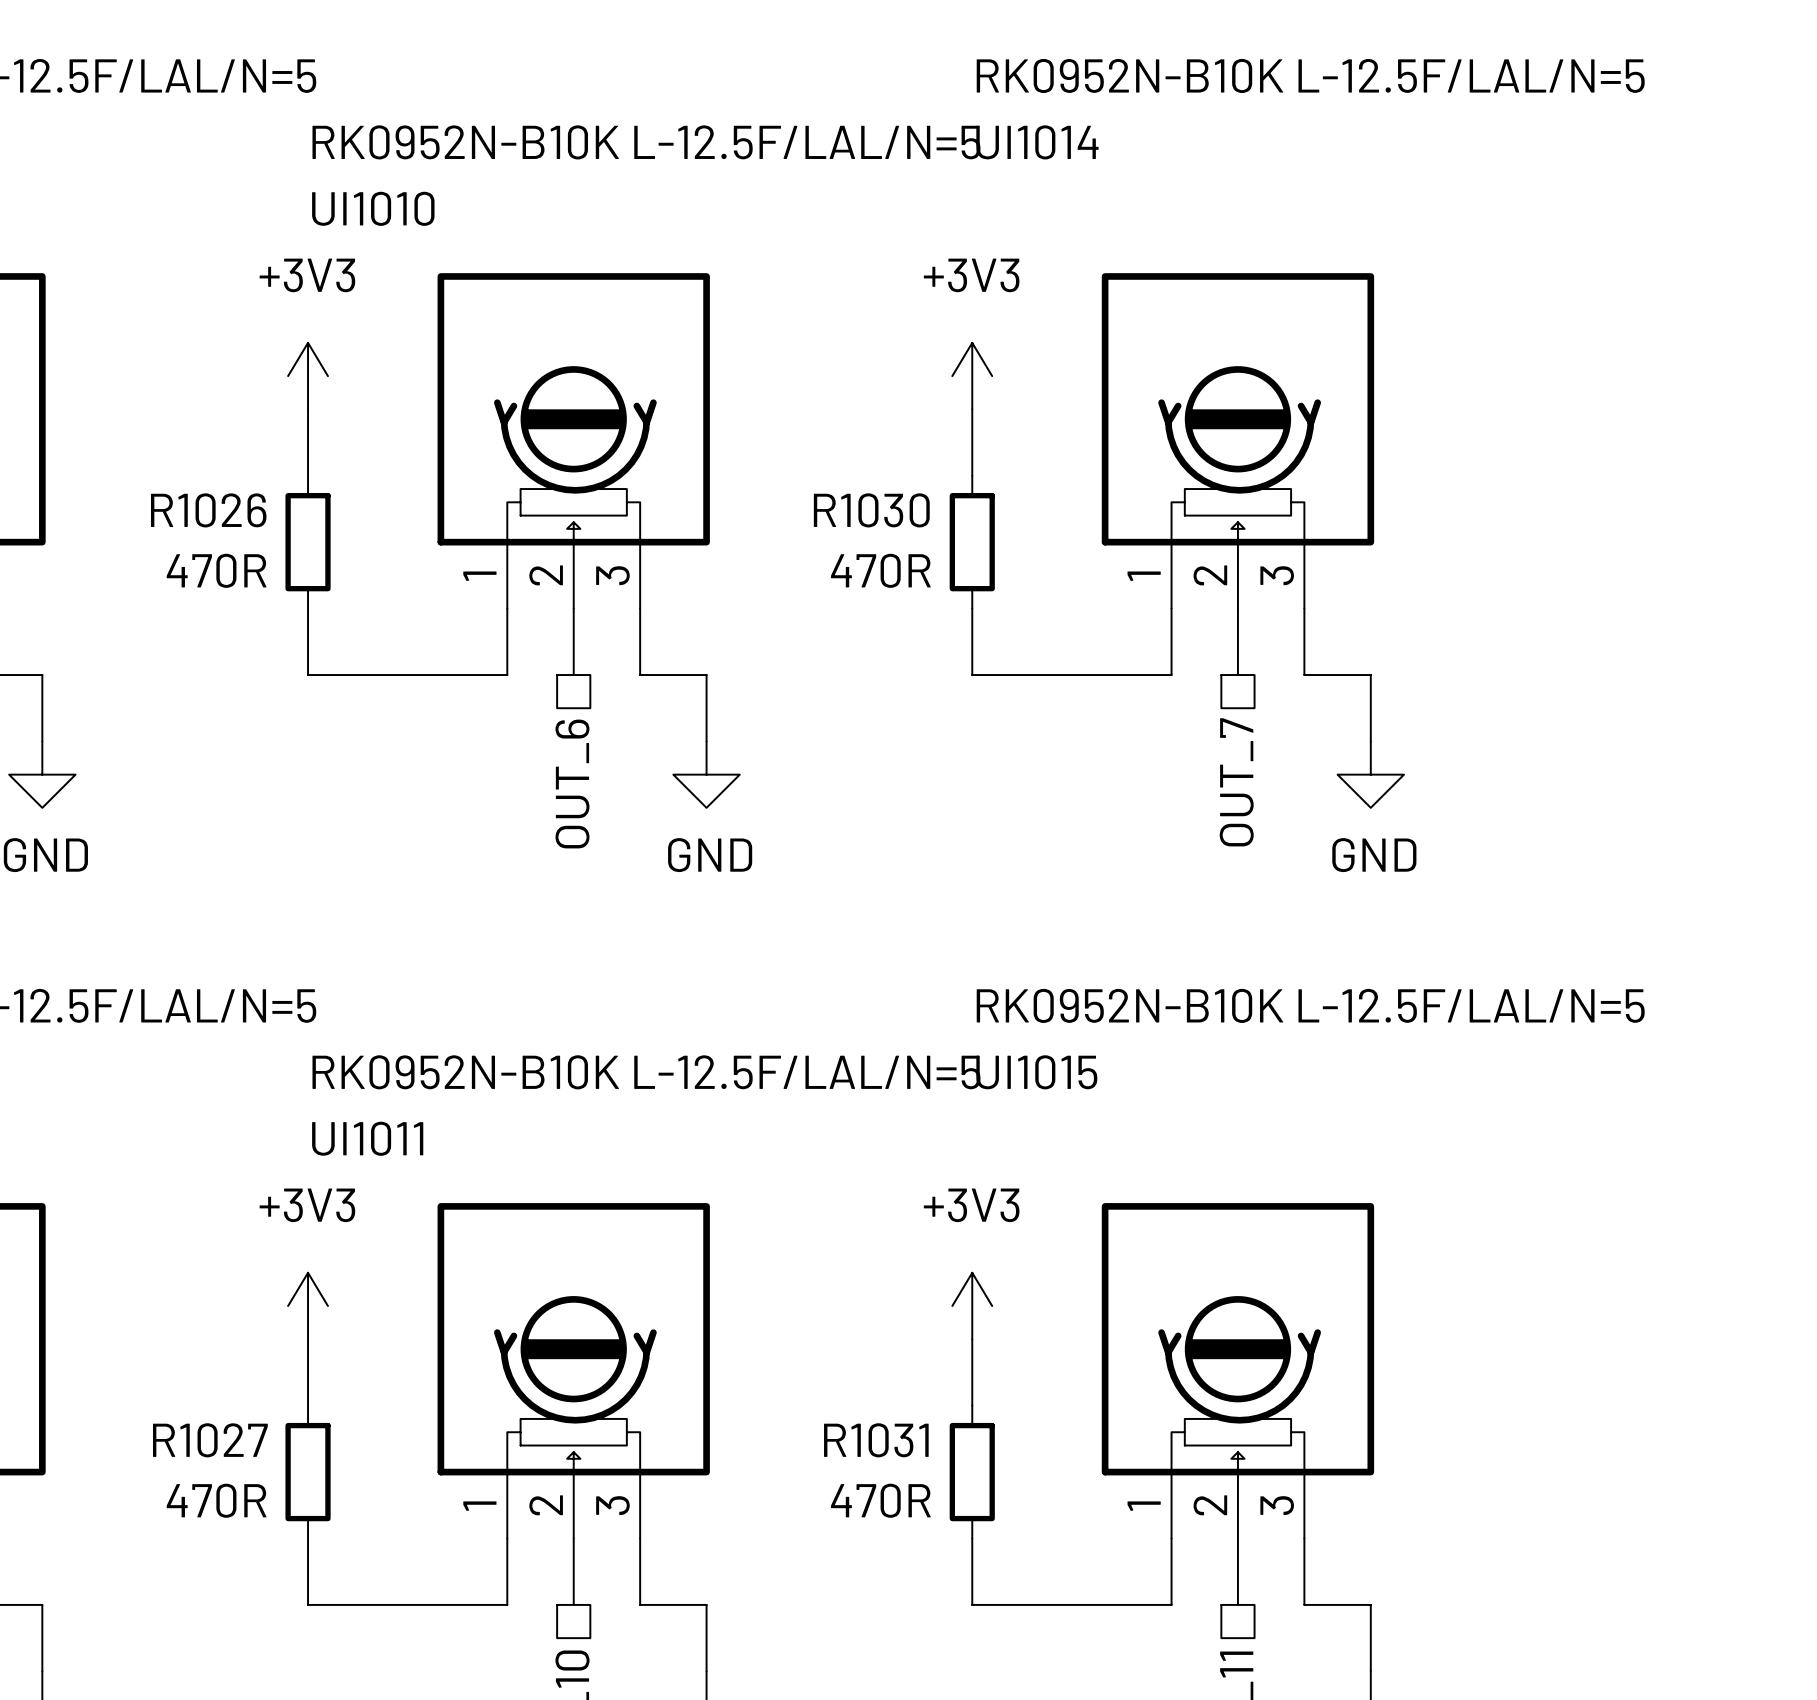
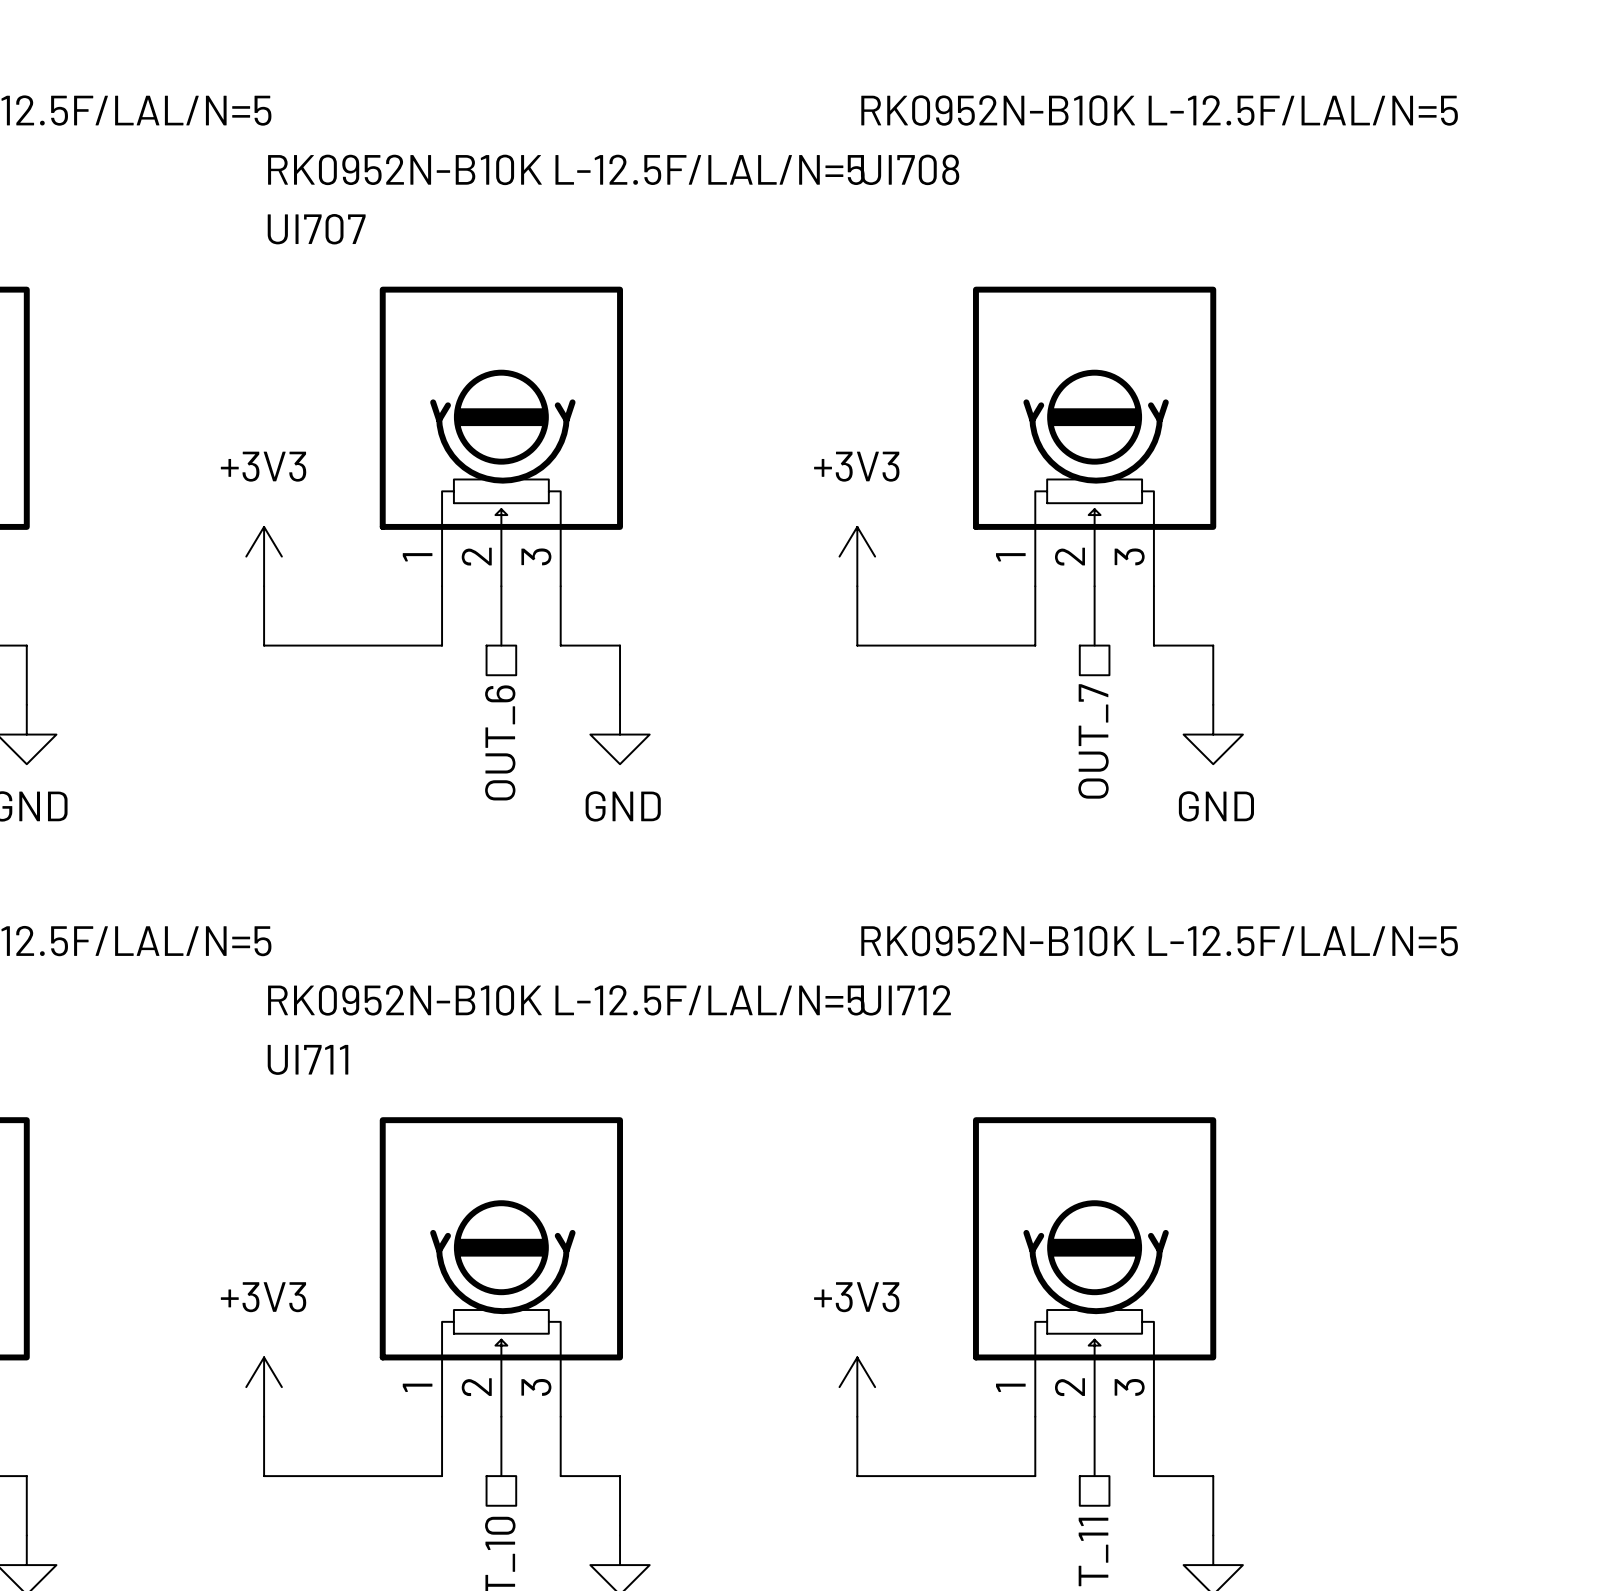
UI1014 name: UI1014 (1037, 142) -> UI708 (910, 169)
UI1010 name: UI1010 (373, 208) -> UI707 (316, 229)
power symbol position: +3V3 (308, 376) -> +3V3 (264, 556)
power symbol position: +3V3 (972, 376) -> +3V3 (857, 556)
wire: (308, 409) (308, 475) -> none
wire: (972, 409) (972, 475) -> none
R1026: 470R (308, 542) -> none
R1030: 470R (972, 542) -> none
UI1015 name: UI1015 (1036, 1072) -> UI712 (905, 1000)
UI1011 name: UI1011 (367, 1138) -> UI711 (308, 1059)
power symbol position: +3V3 (308, 1306) -> +3V3 (264, 1387)
power symbol position: +3V3 (972, 1306) -> +3V3 (857, 1387)
wire: (308, 1339) (308, 1405) -> none
wire: (972, 1339) (972, 1405) -> none
R1027: 470R (308, 1472) -> none
R1031: 470R (972, 1472) -> none

